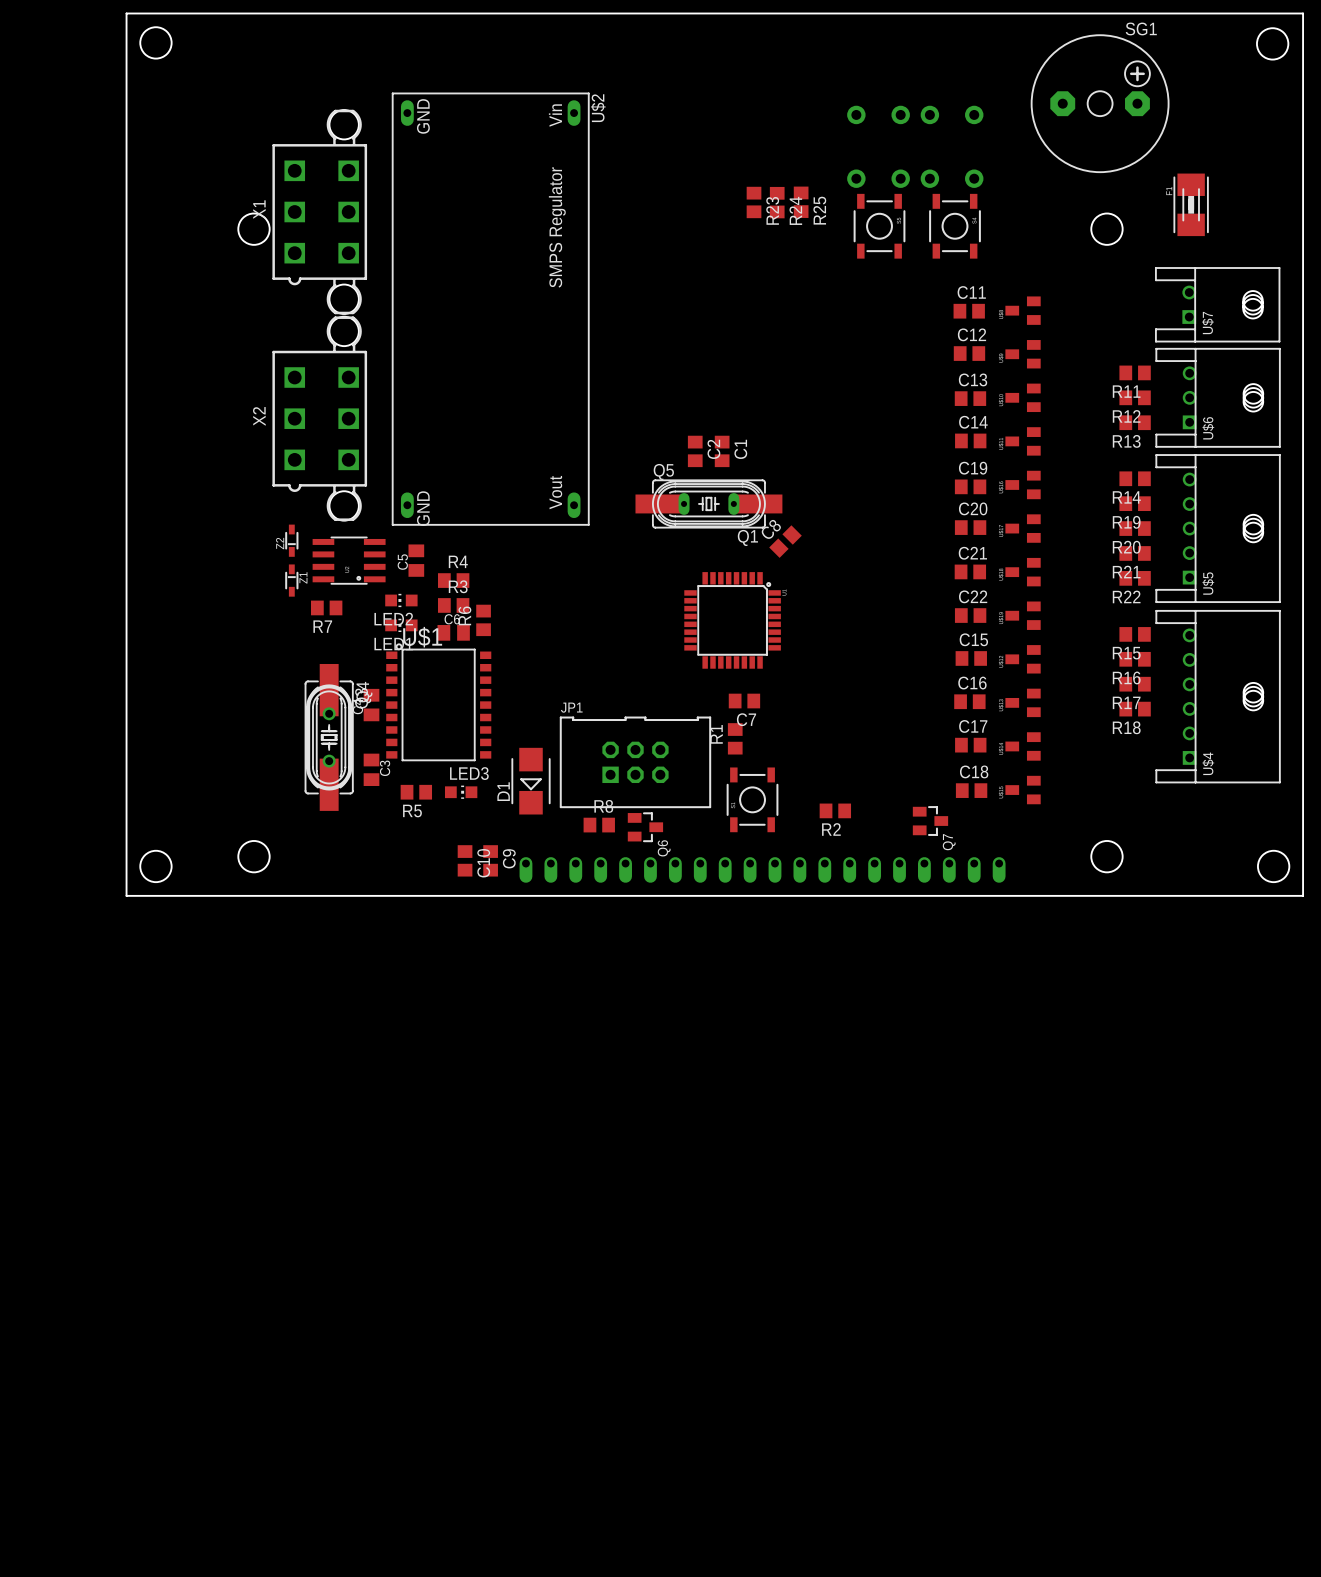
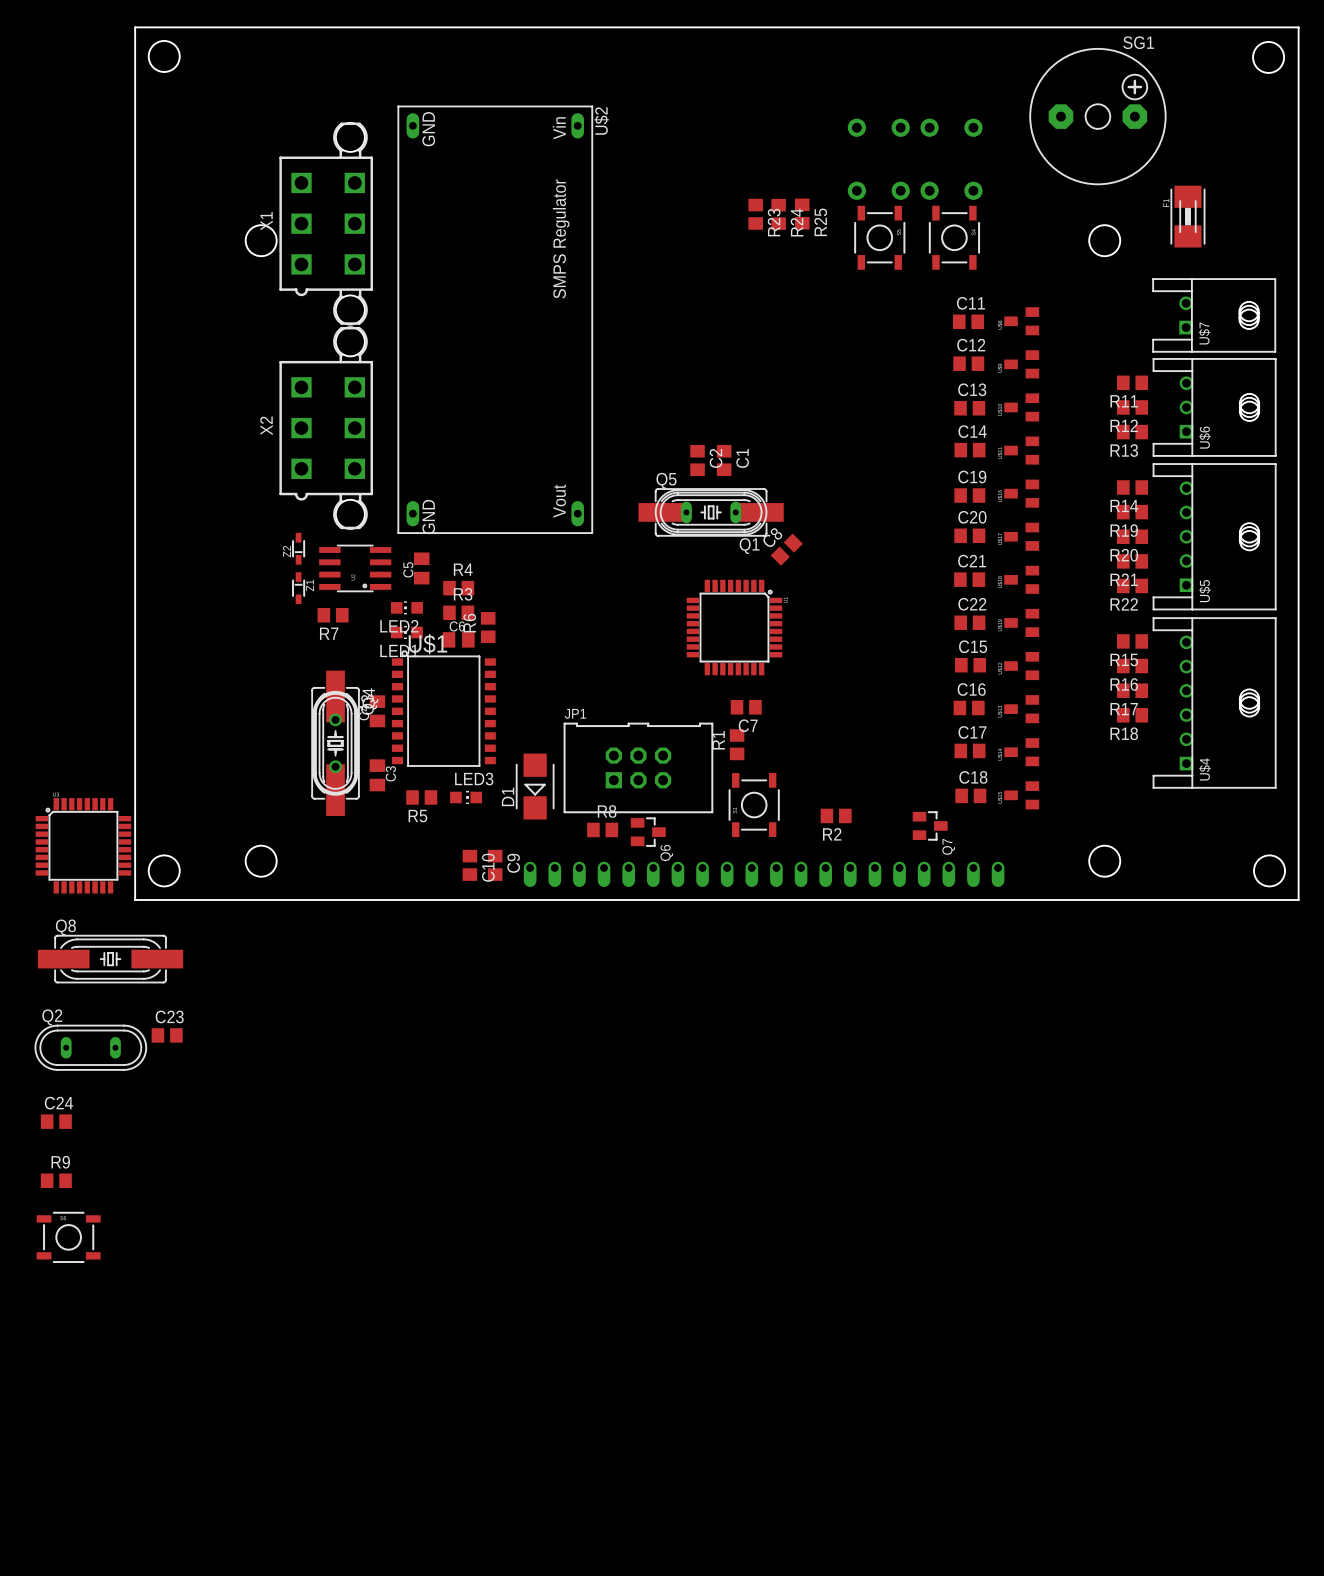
part: none -> (83, 845)
Q8: none -> (110, 959)
C23: none -> (167, 1035)
Q2: none -> (90, 1047)
C24: none -> (56, 1121)
R9: none -> (56, 1180)
part: none -> (68, 1237)

